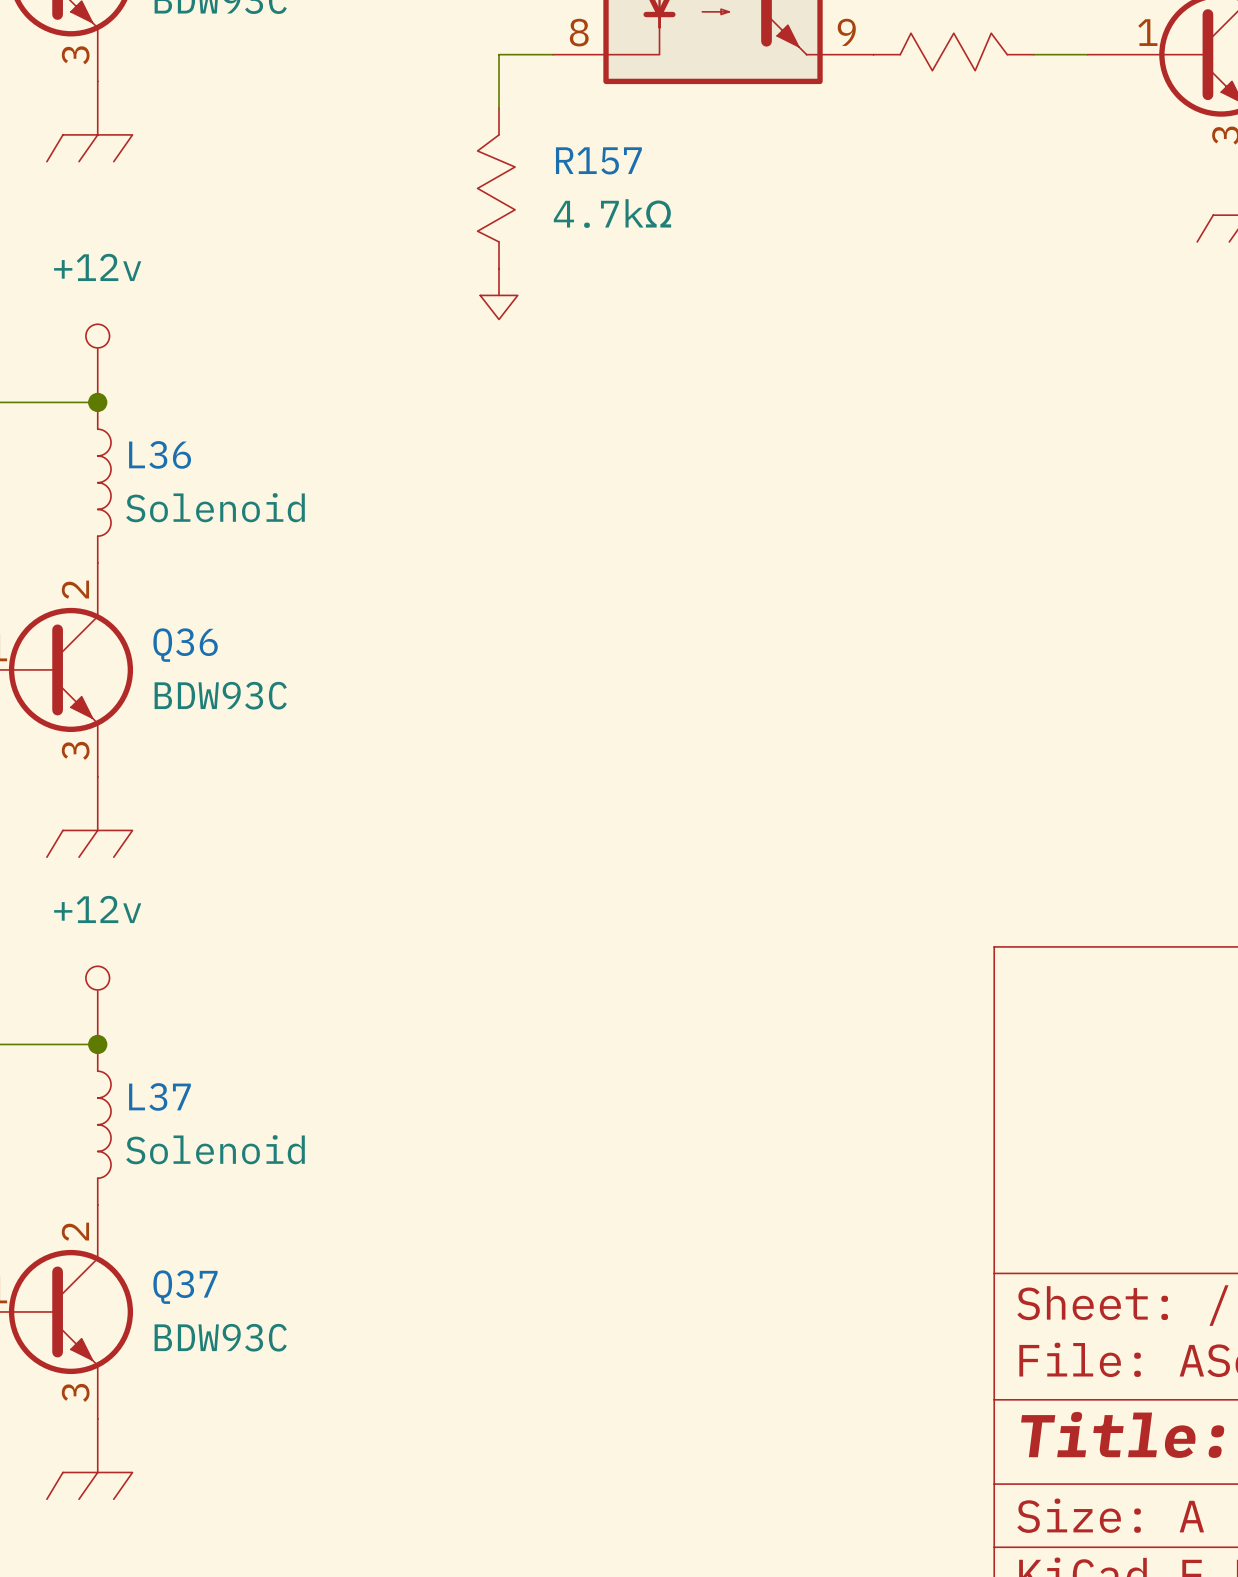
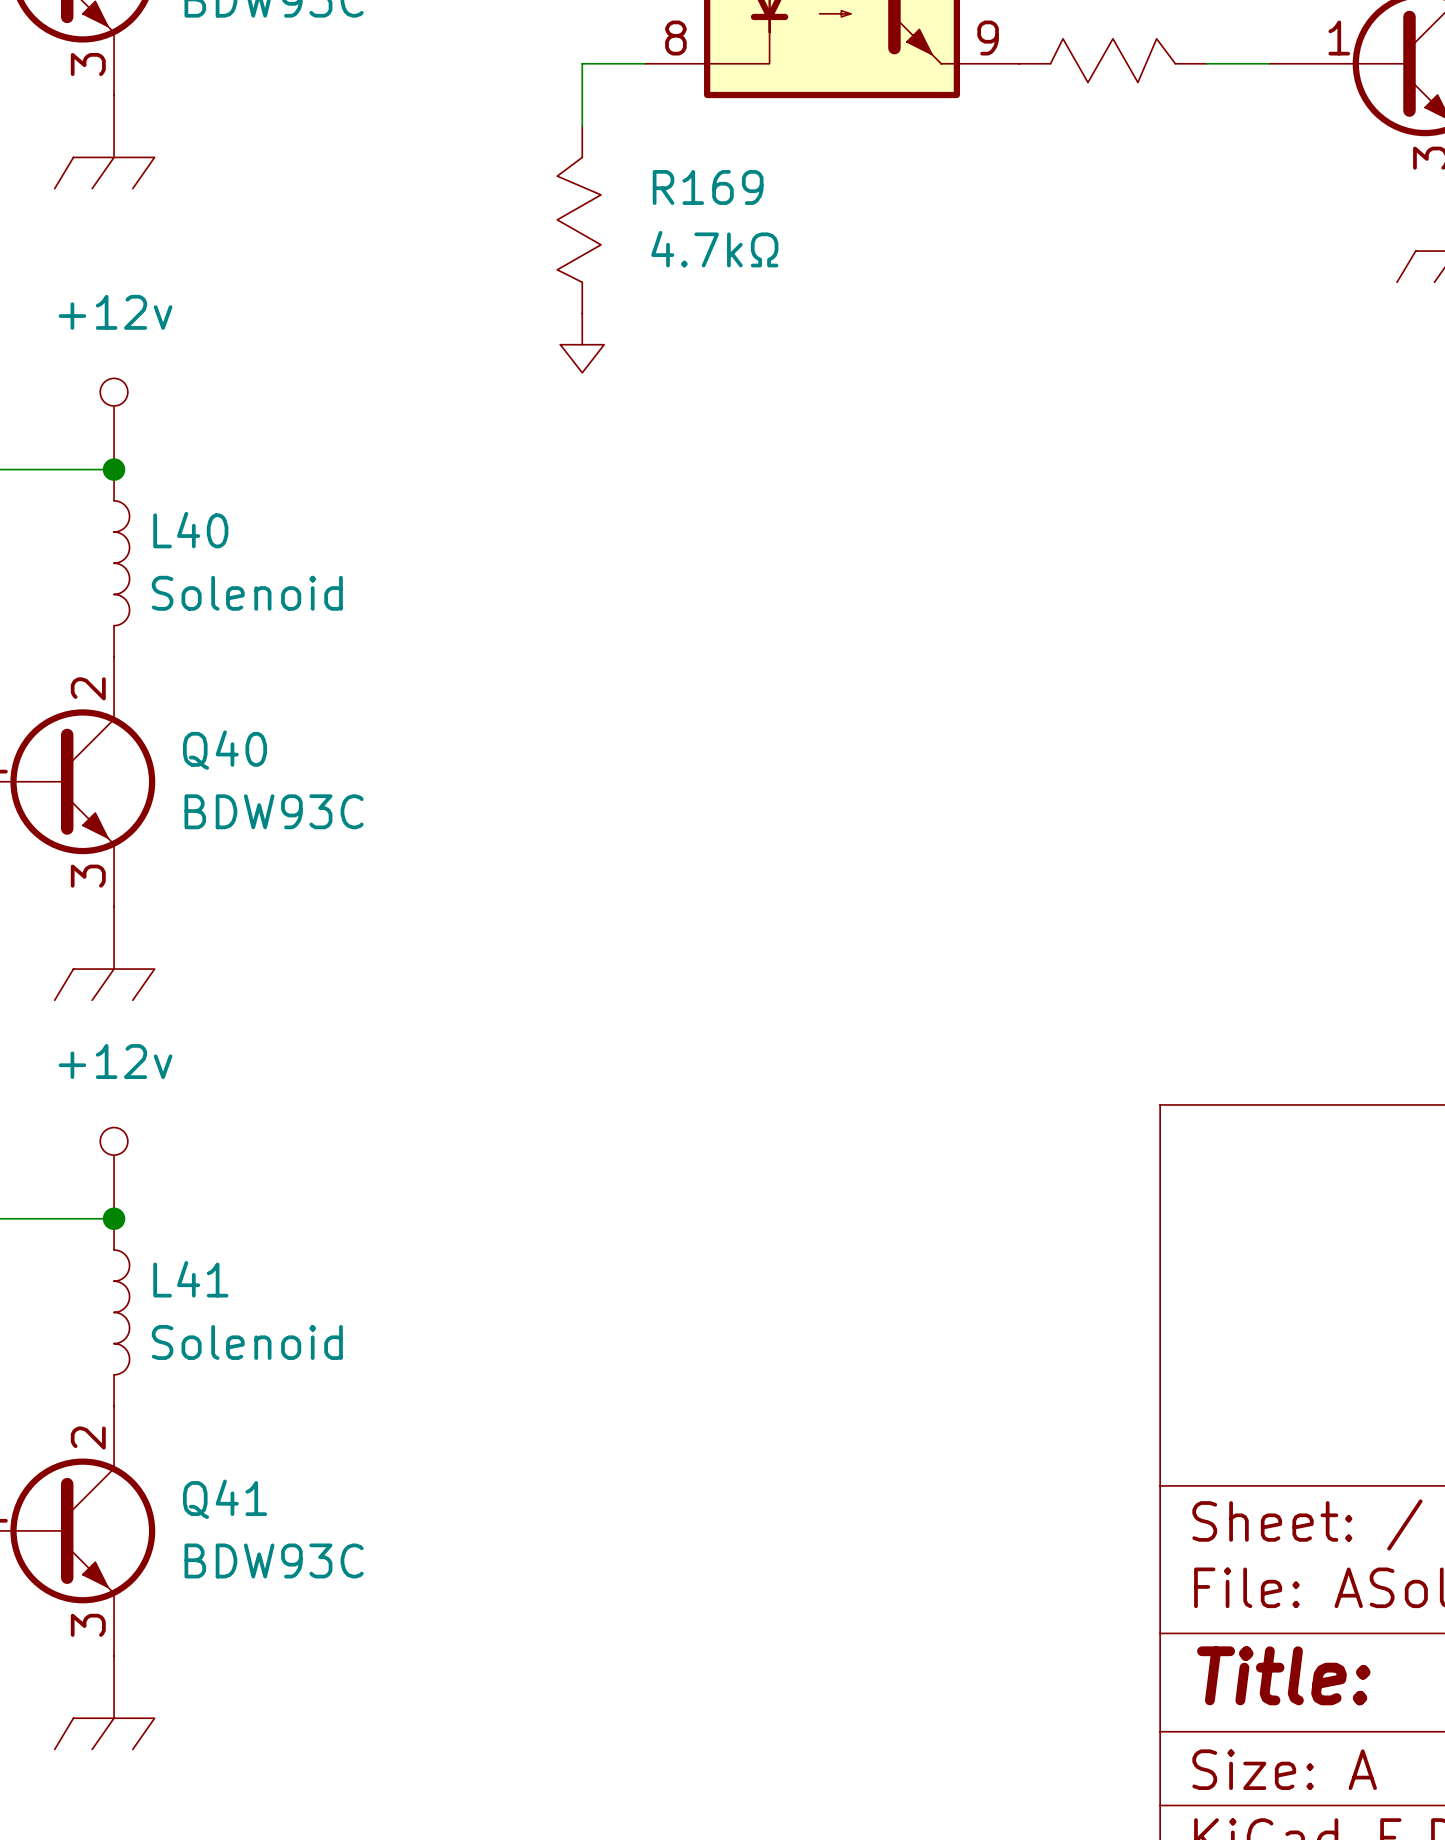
R157 name: R157 (598, 160) -> R169 (708, 187)
L36 name: L36 (160, 454) -> L40 (190, 530)
Q36 name: Q36 (185, 645) -> Q40 (225, 750)
L37 name: L37 (159, 1096) -> L41 (190, 1279)
Q37 name: Q37 (185, 1287) -> Q41 (225, 1499)

